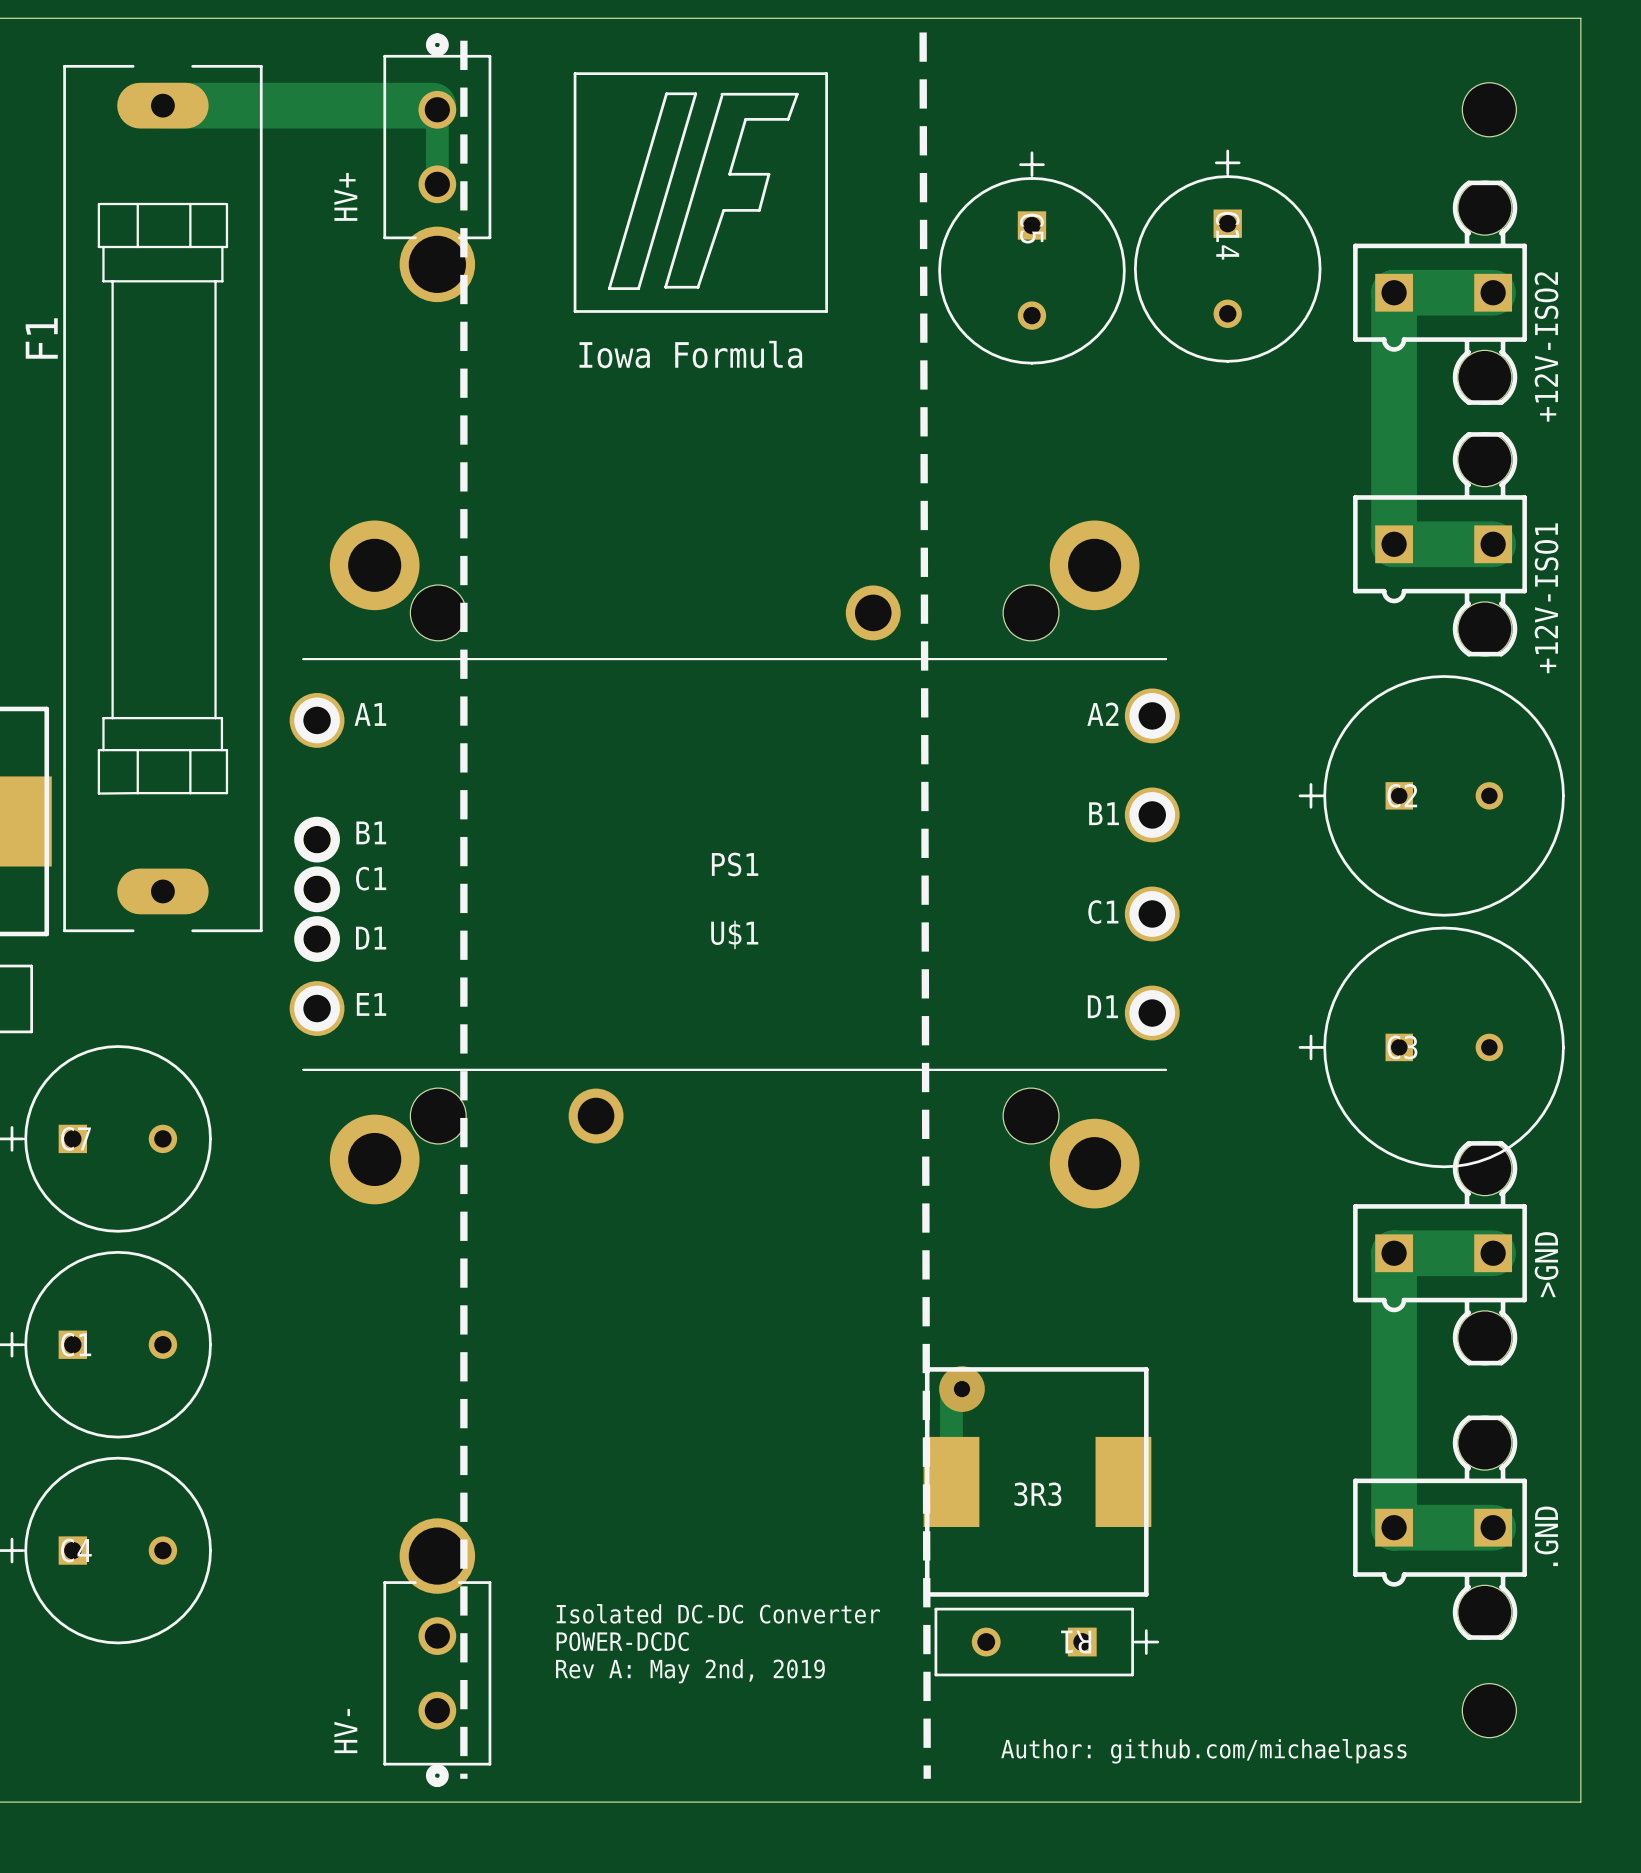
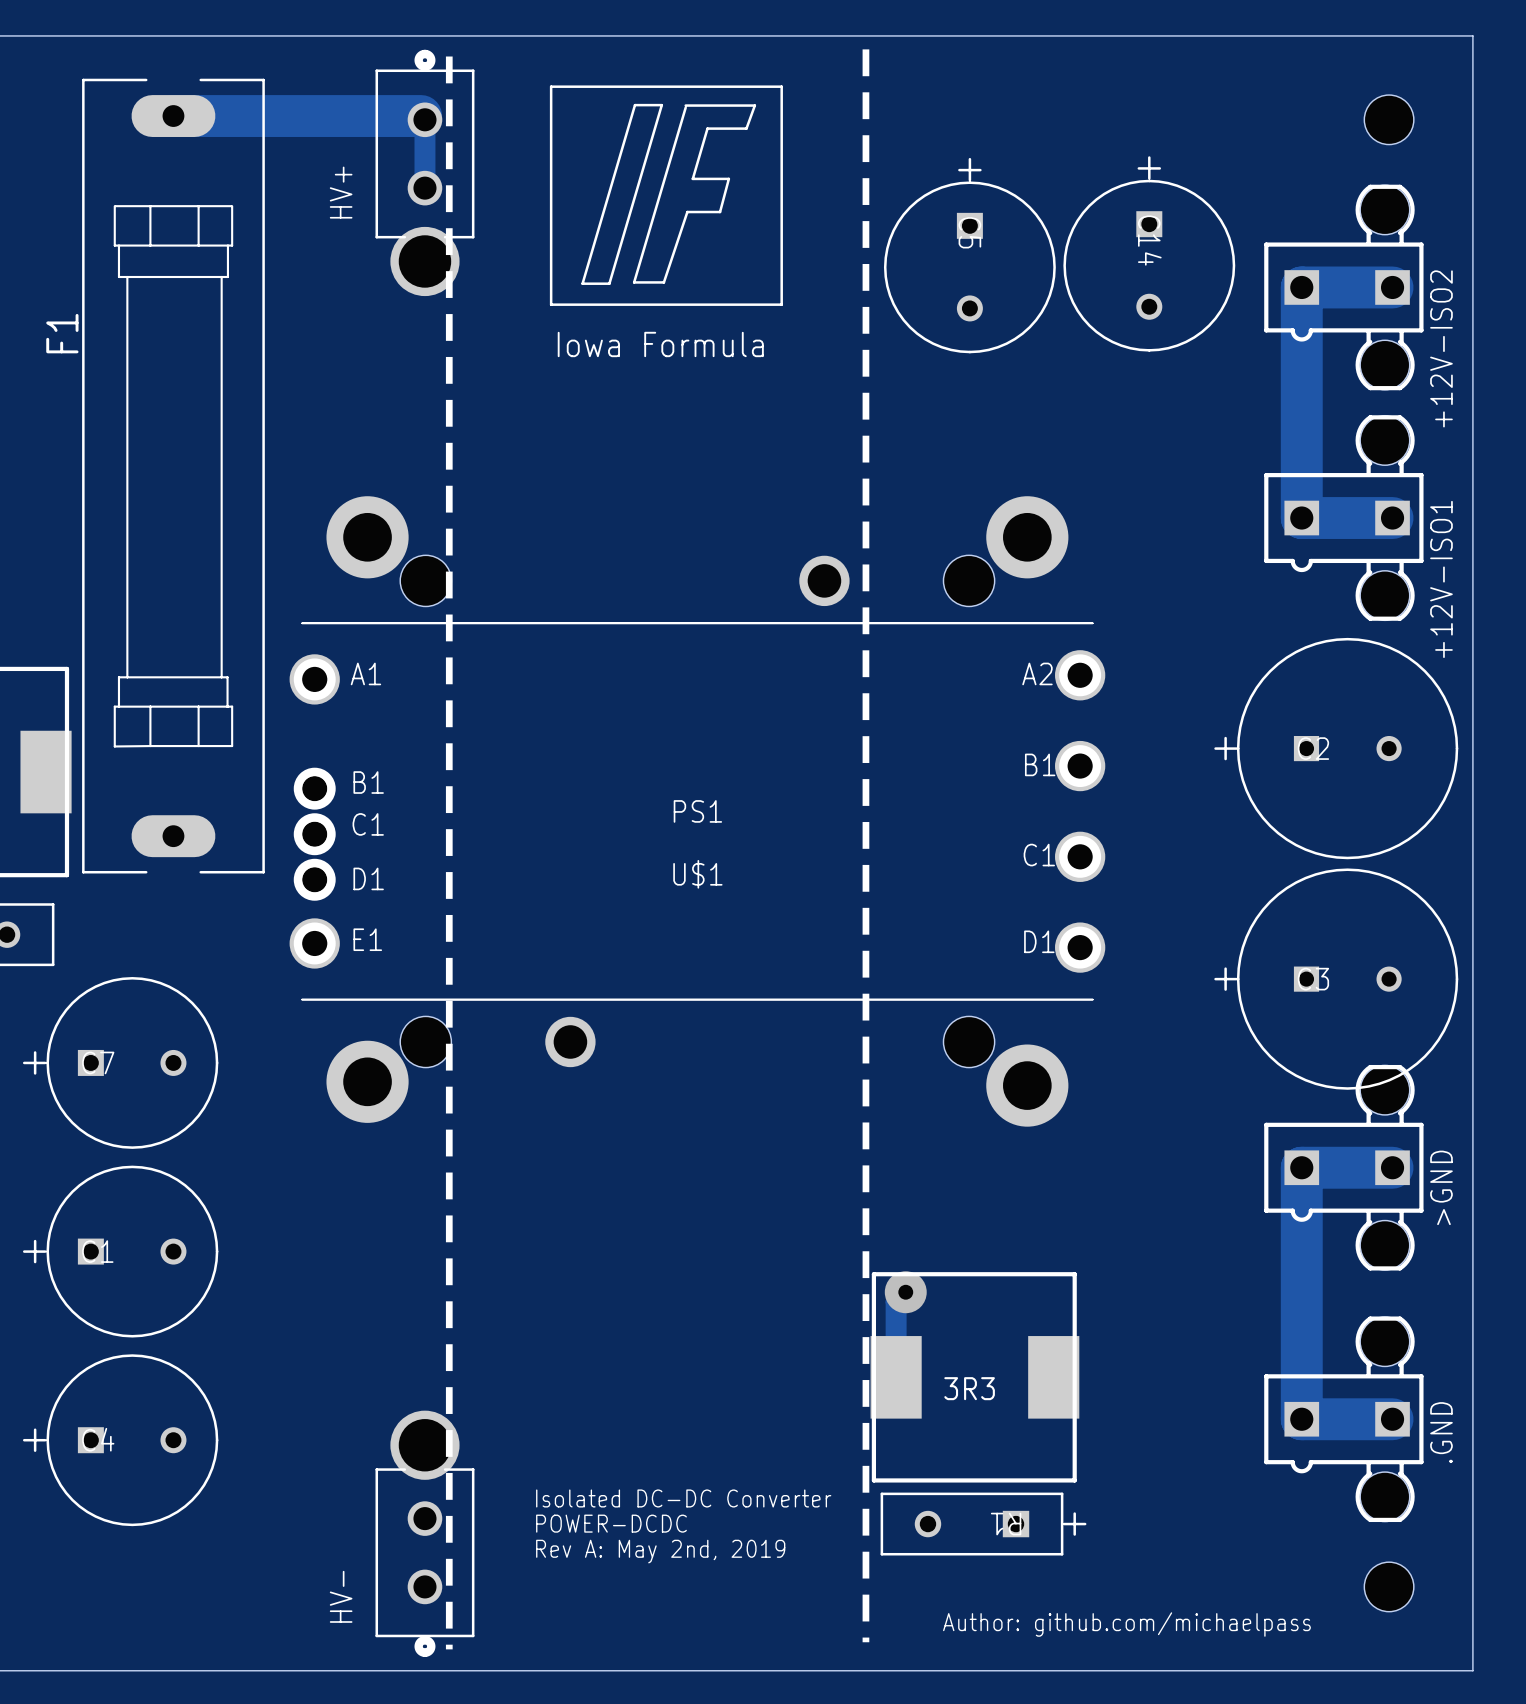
line: none -> (865, 49) (865, 1642)
line: (923, 32) (927, 1778) -> none

